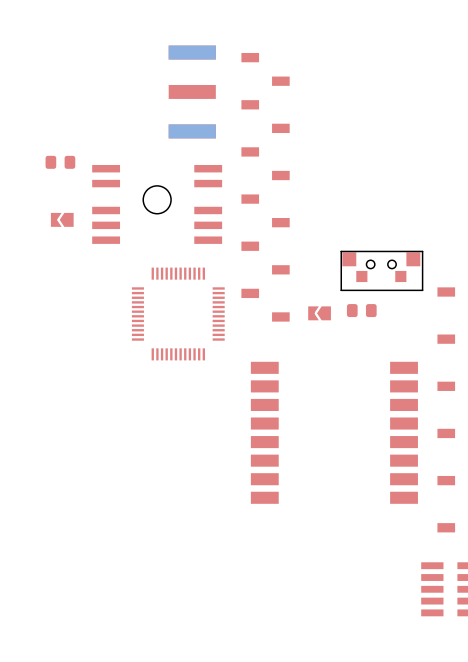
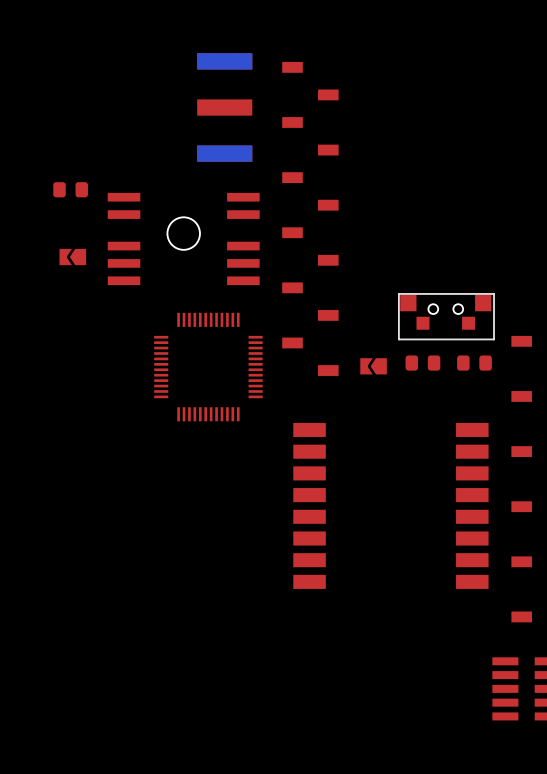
part: none -> (474, 363)

